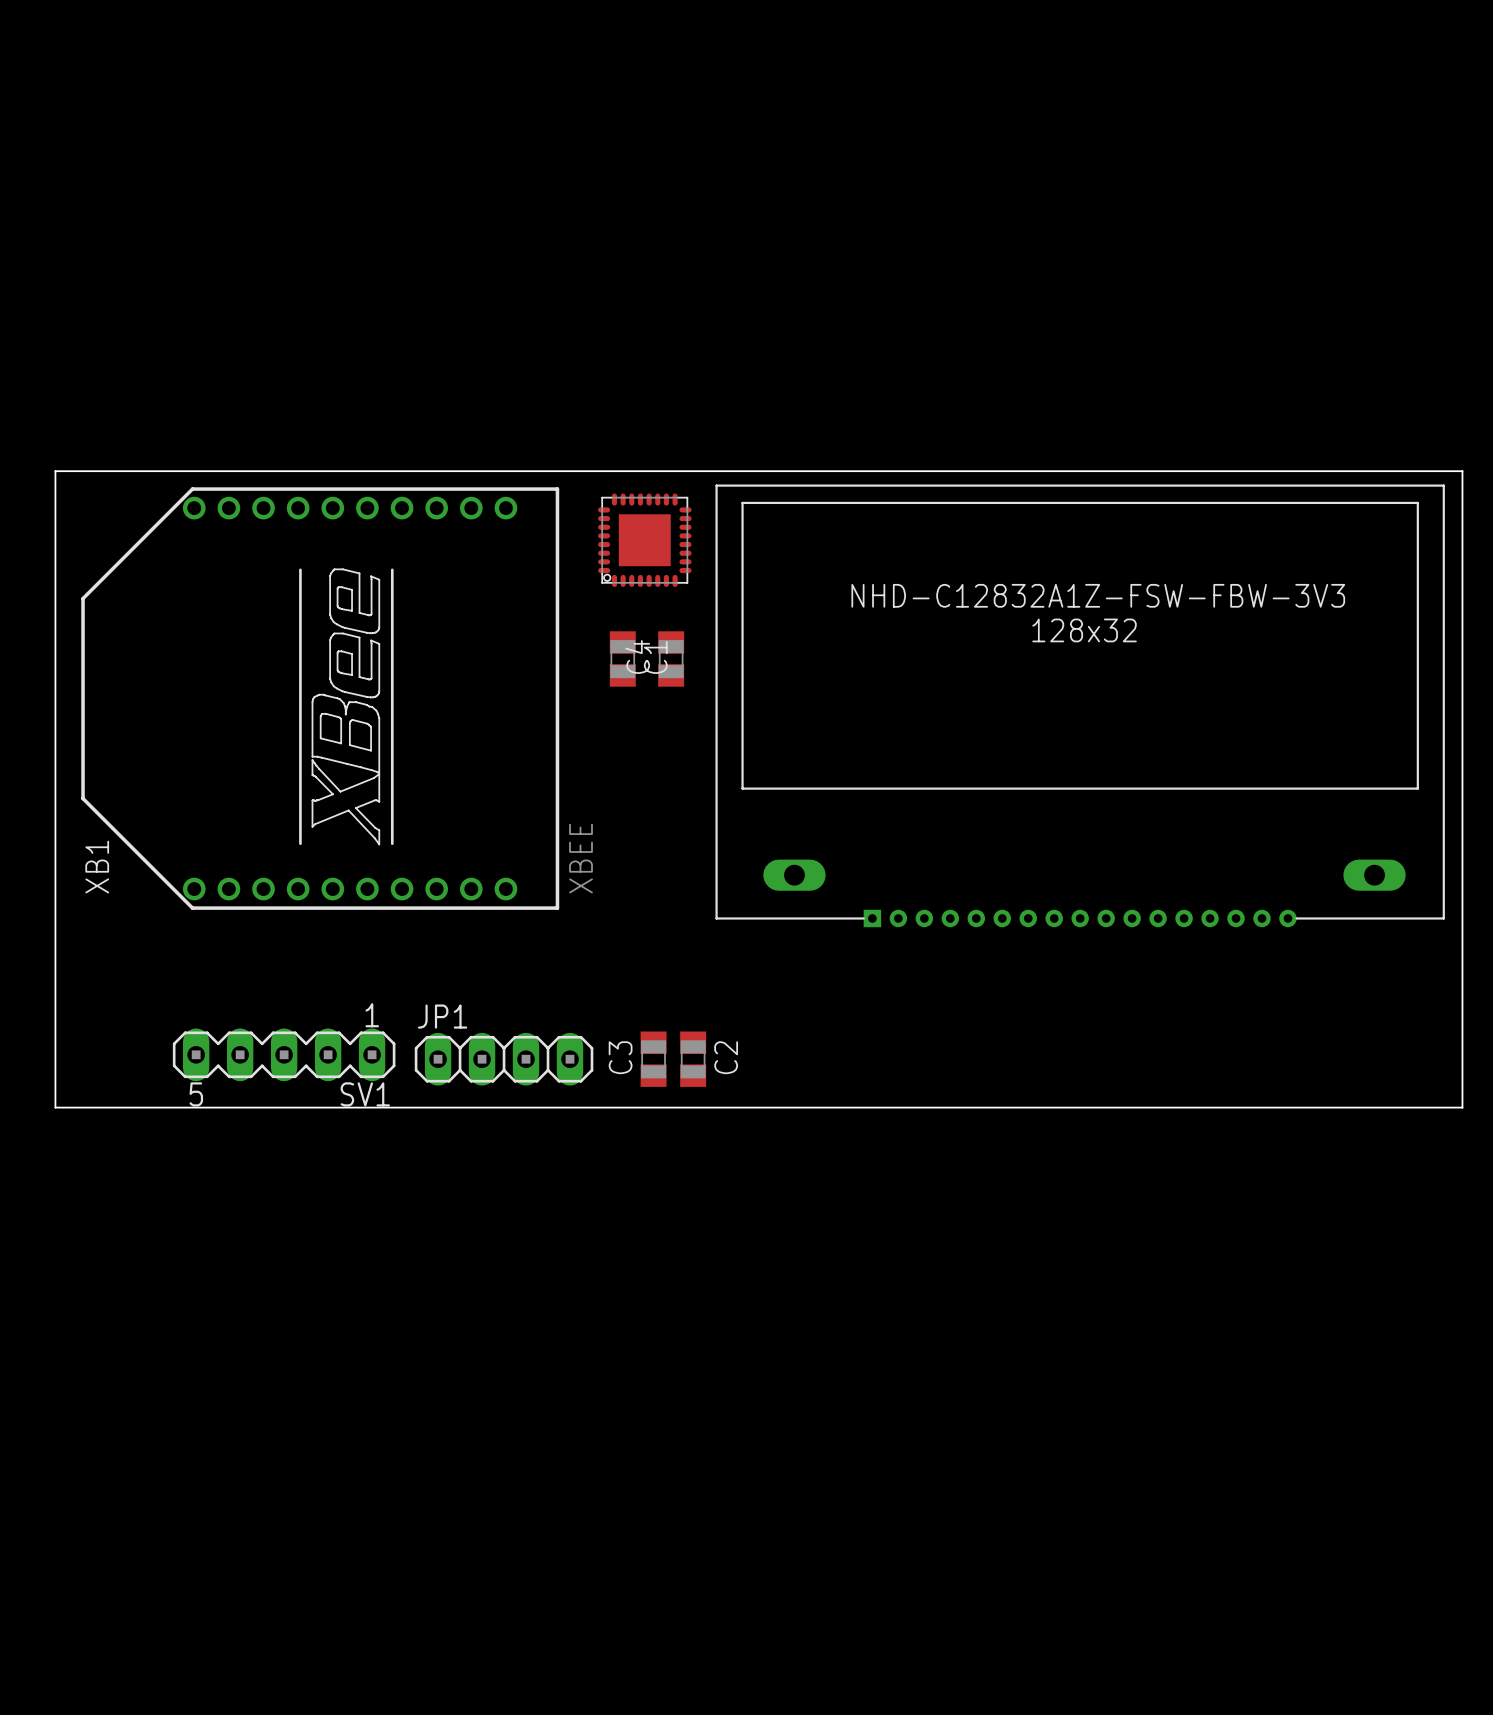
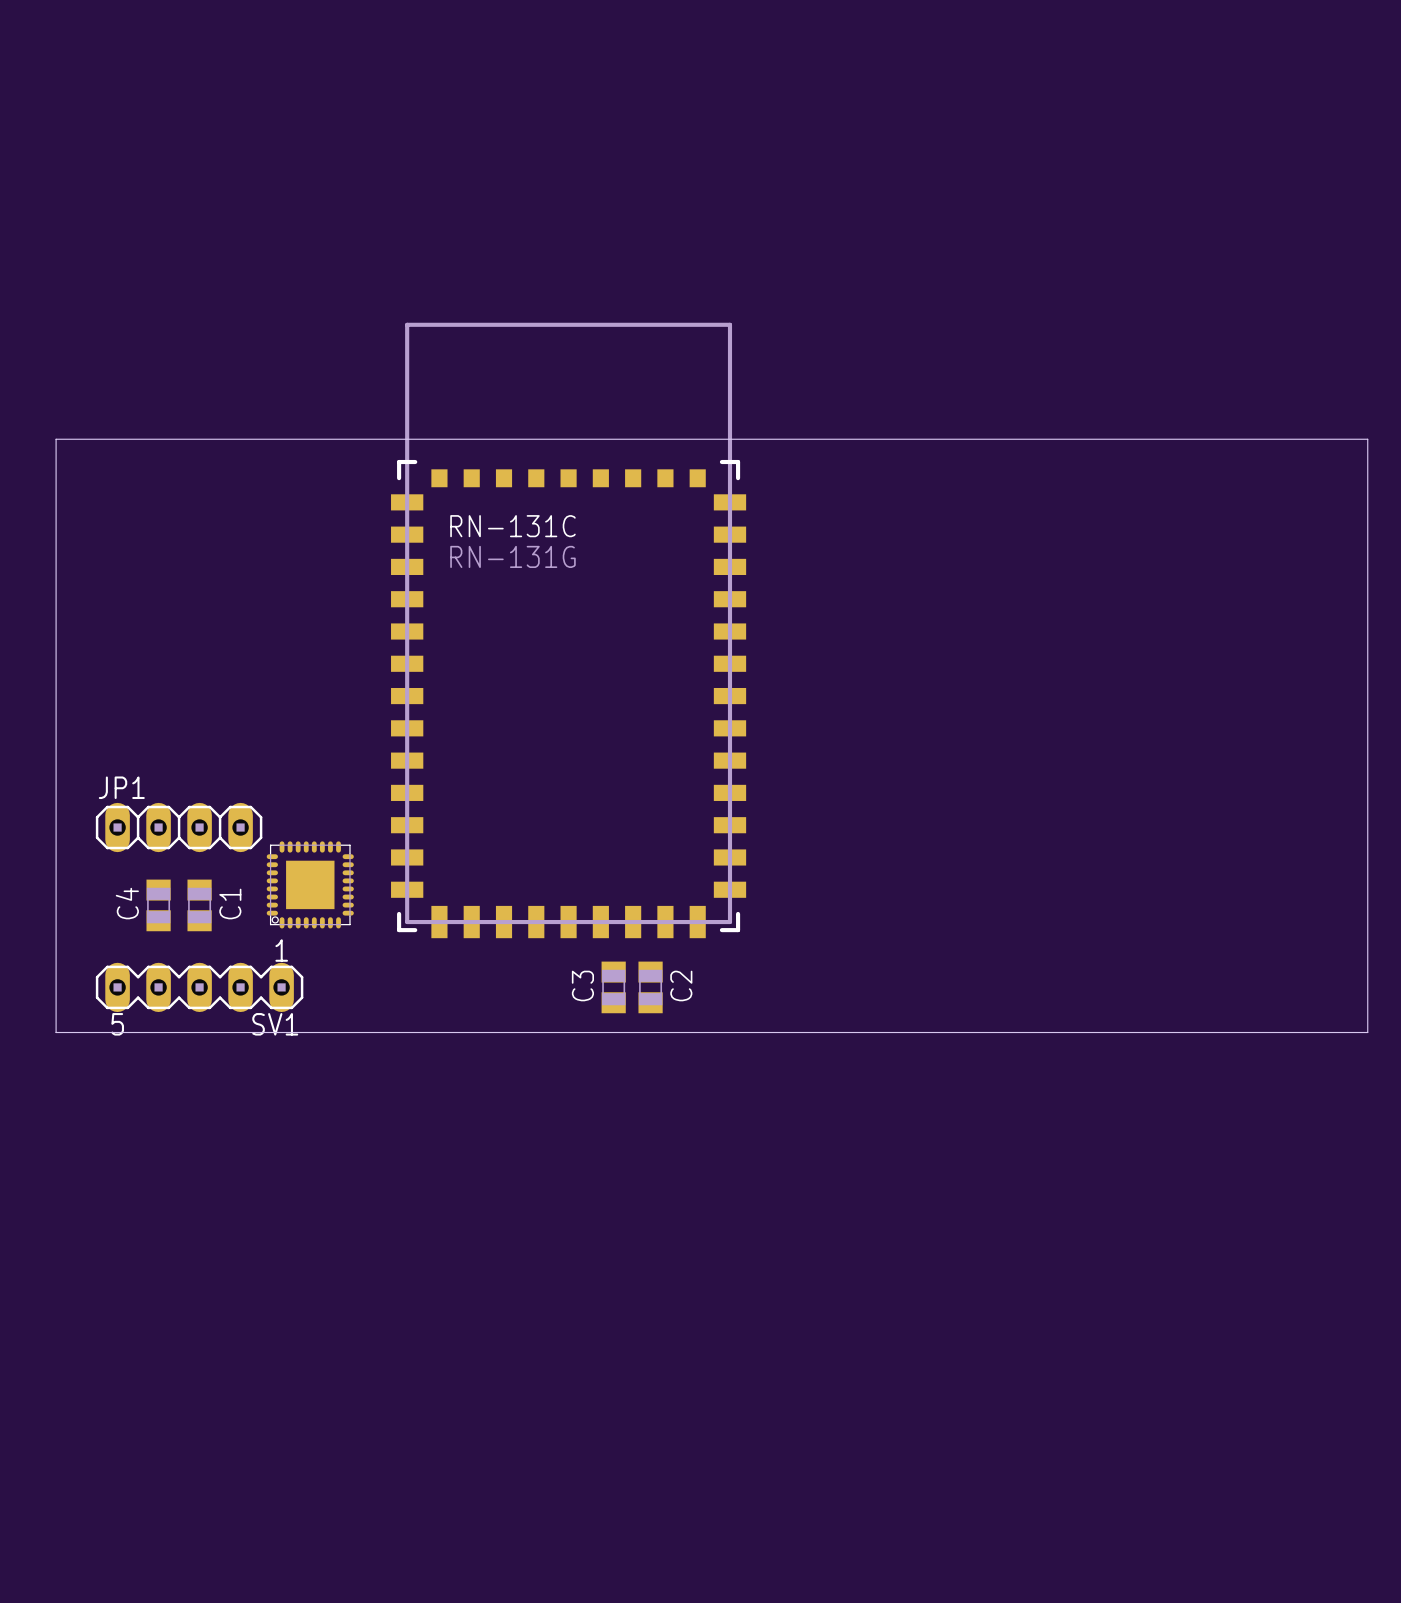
part: (644, 540) -> none
C1 position: (622, 658) -> (199, 905)
C4 position: (671, 658) -> (158, 905)
RN-131C: none -> RN-131G (568, 630)
XB1: XBEE (320, 698) -> none
part: (1080, 705) -> none
part: none -> (310, 884)
SV1 position: (284, 1054) -> (199, 987)
JP1 position: (504, 1059) -> (179, 827)

